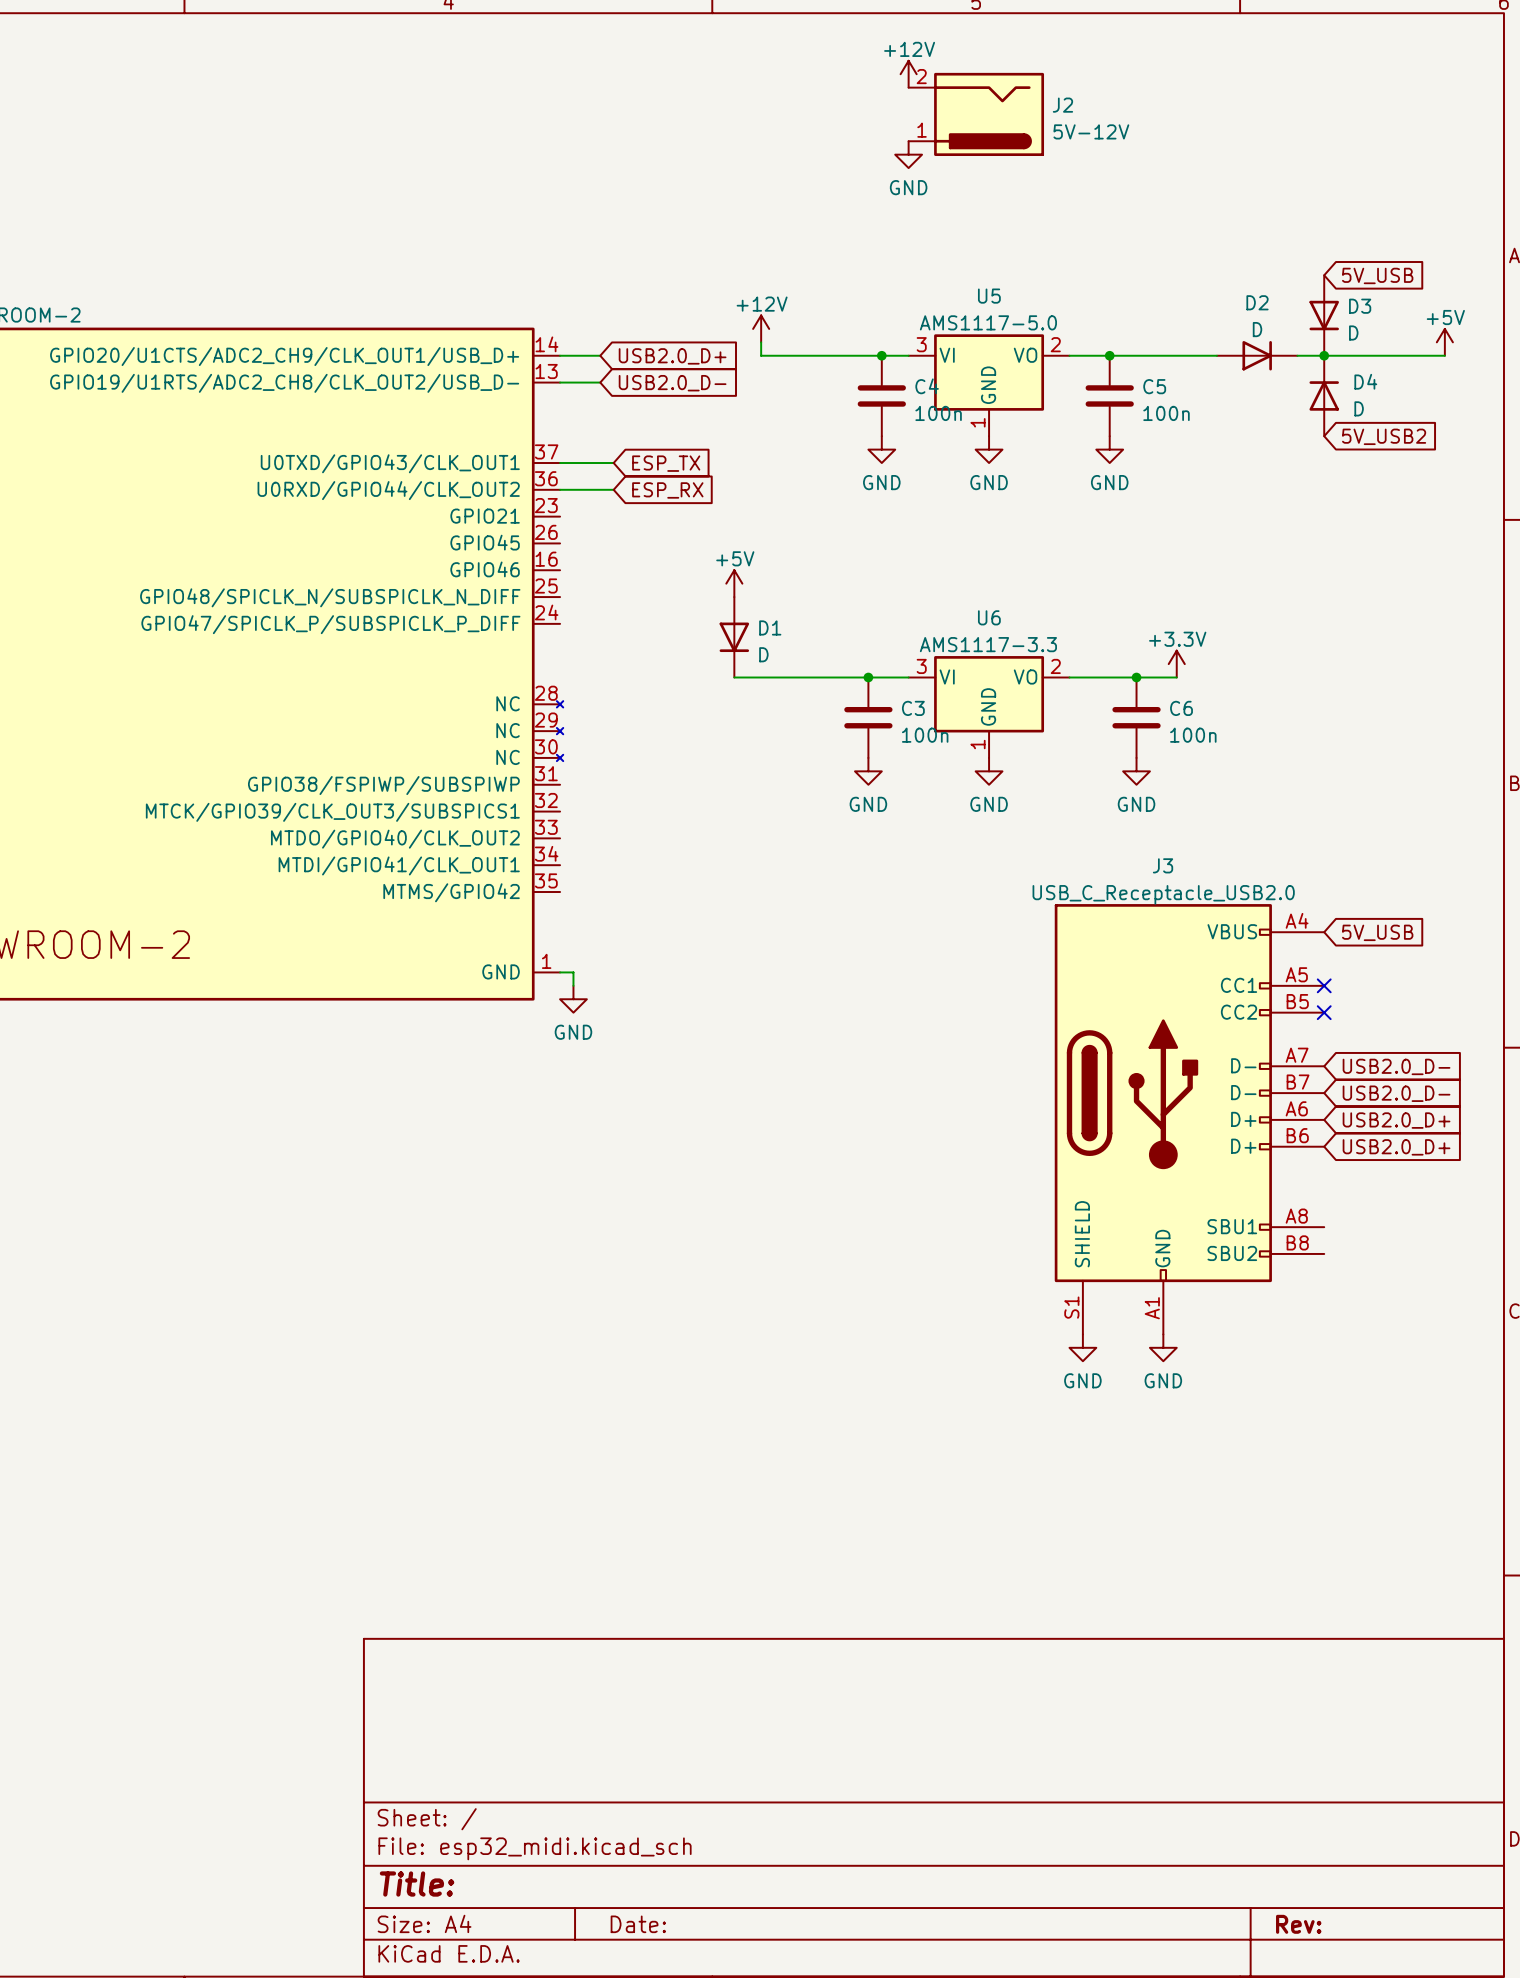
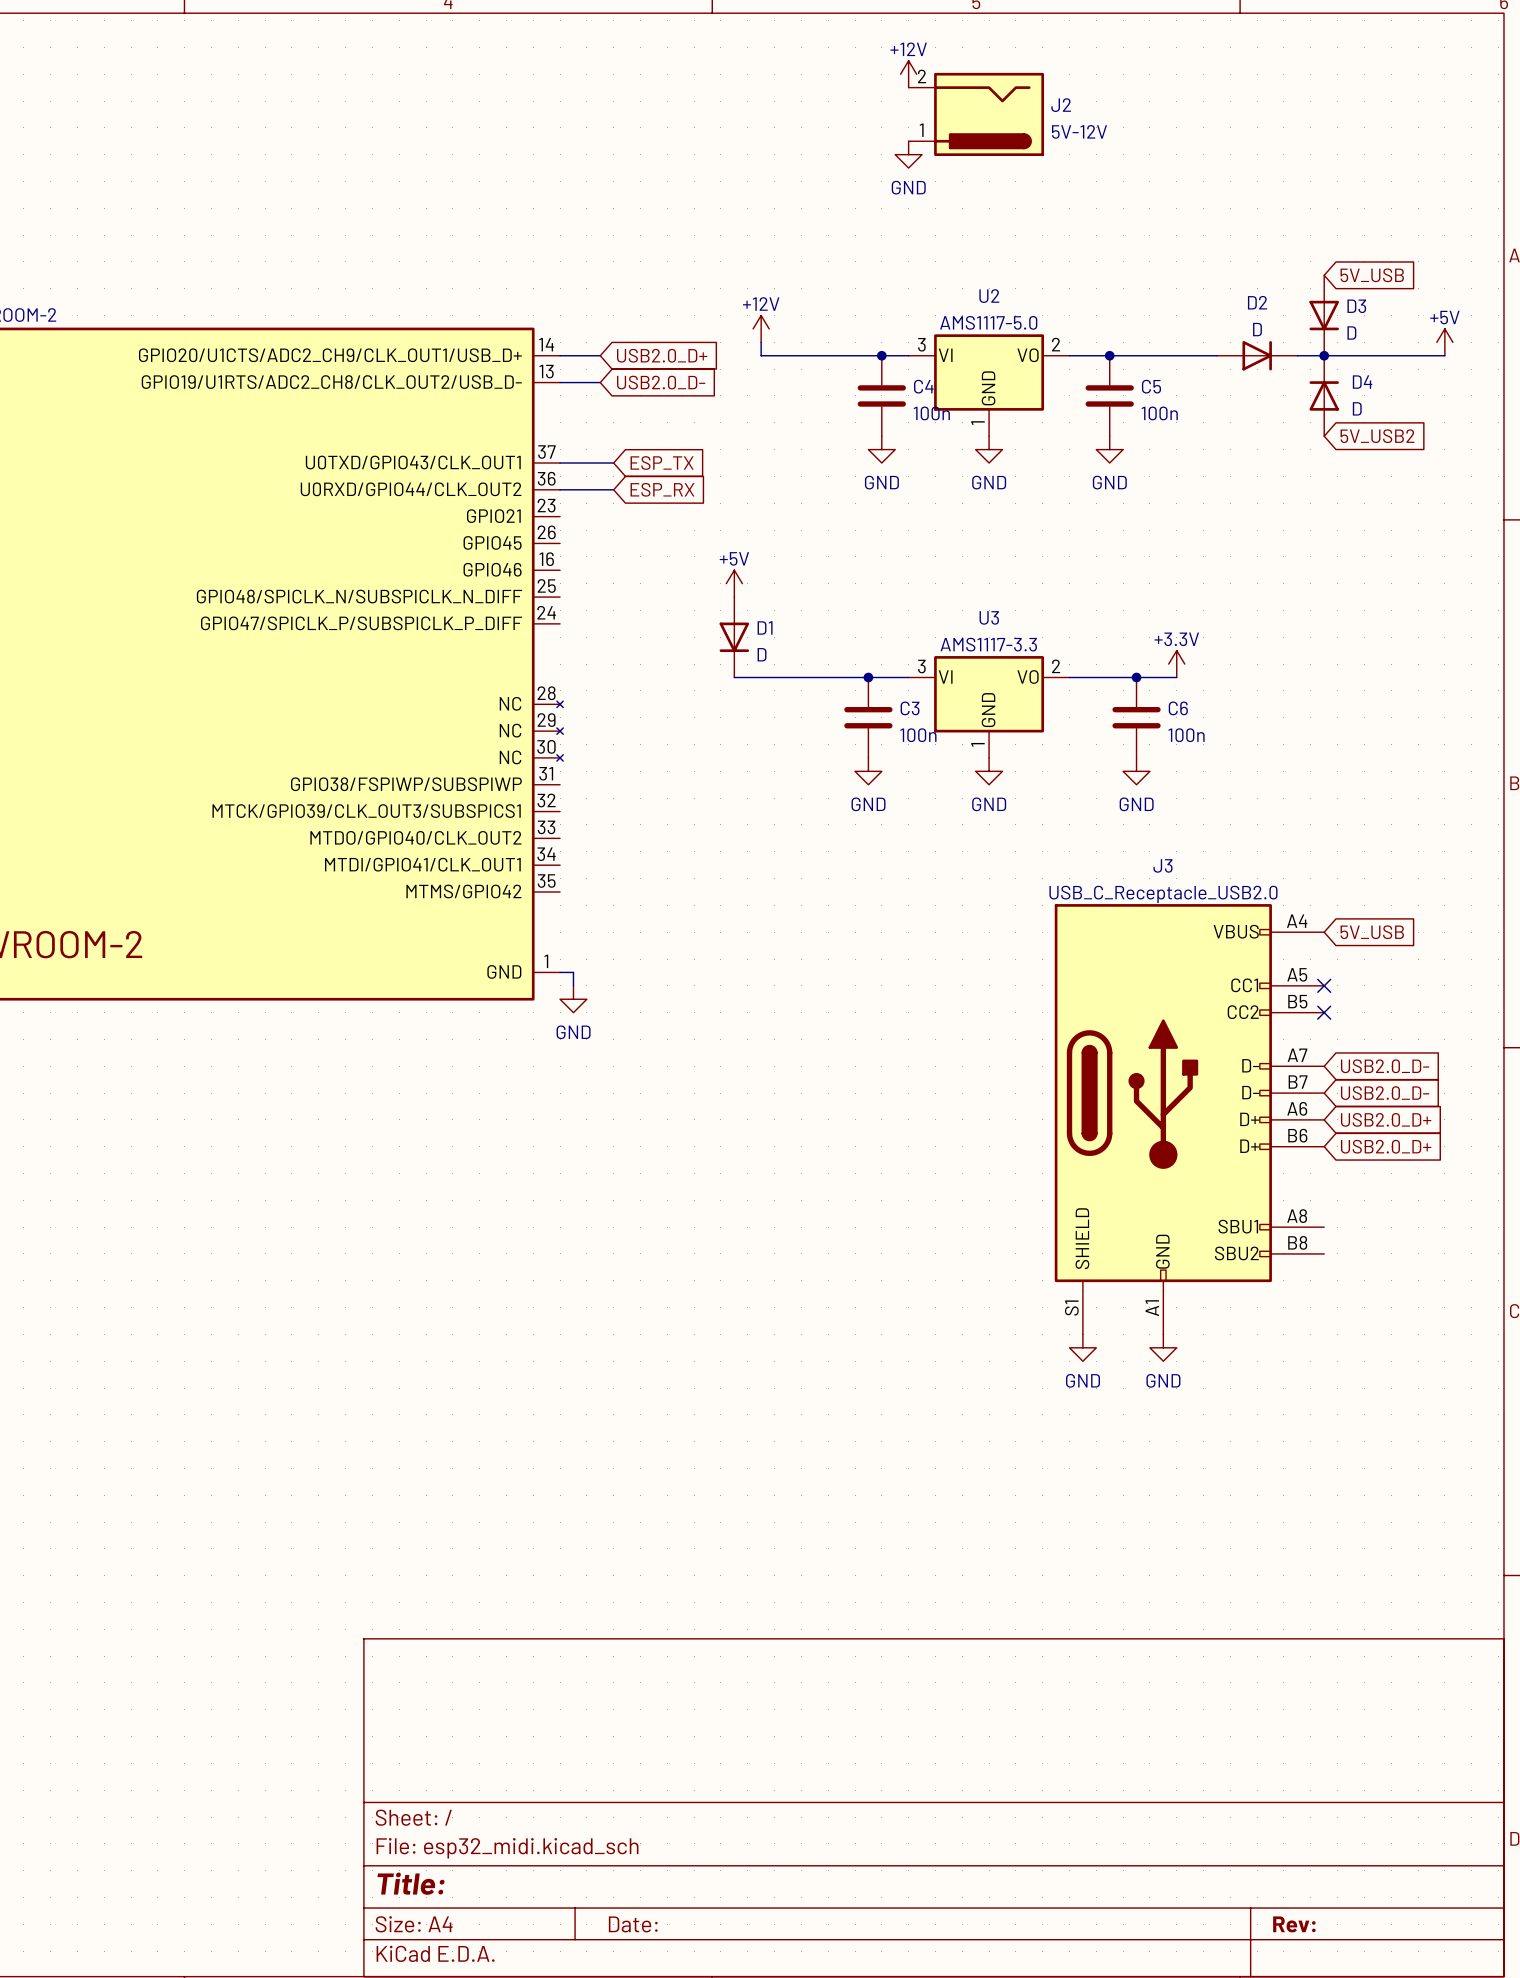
U5 name: U5 (989, 296) -> U2 (989, 296)
U6 name: U6 (989, 617) -> U3 (989, 617)

